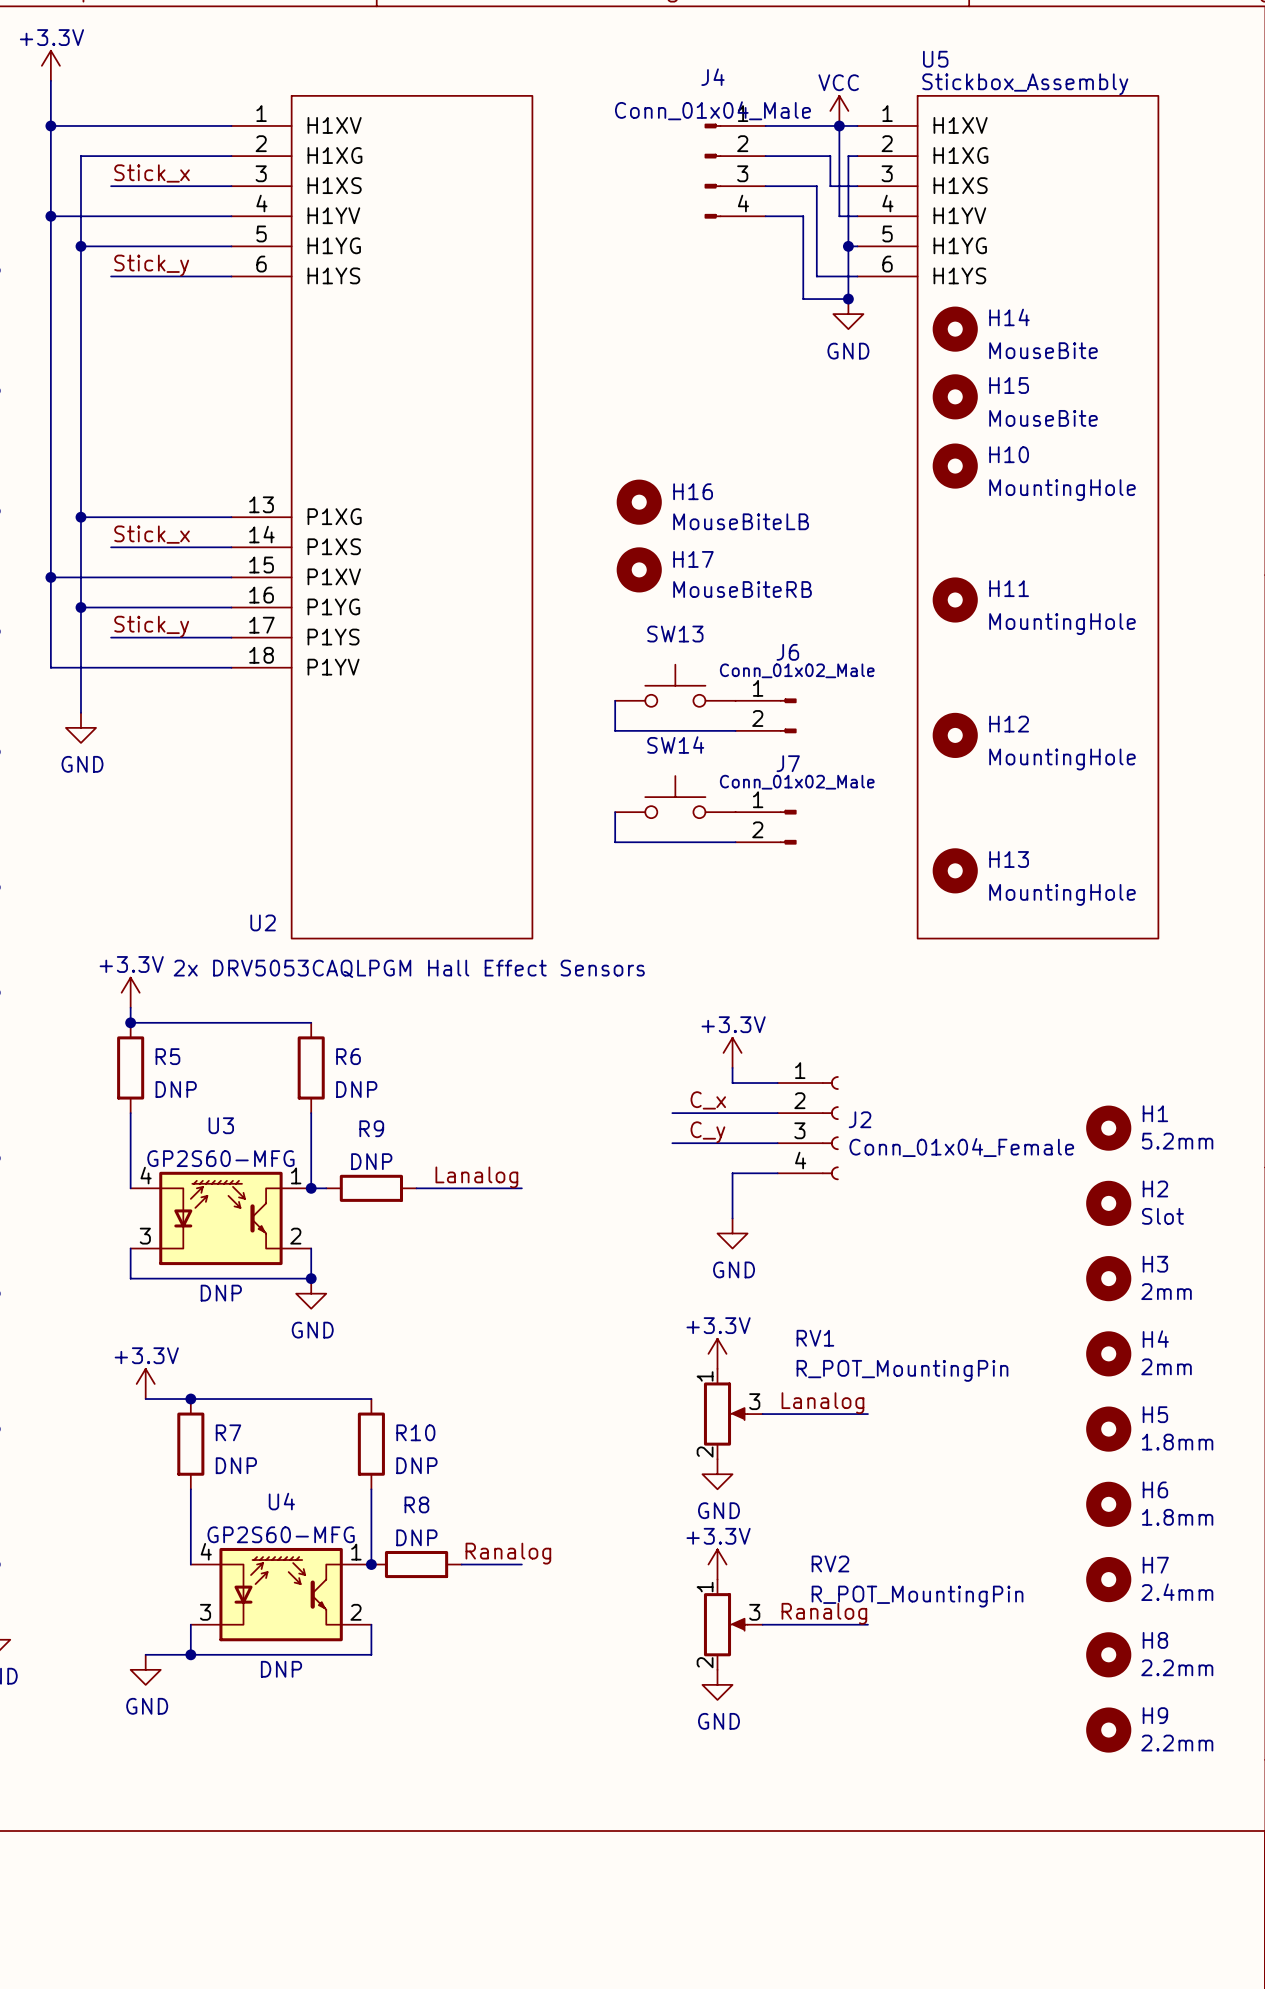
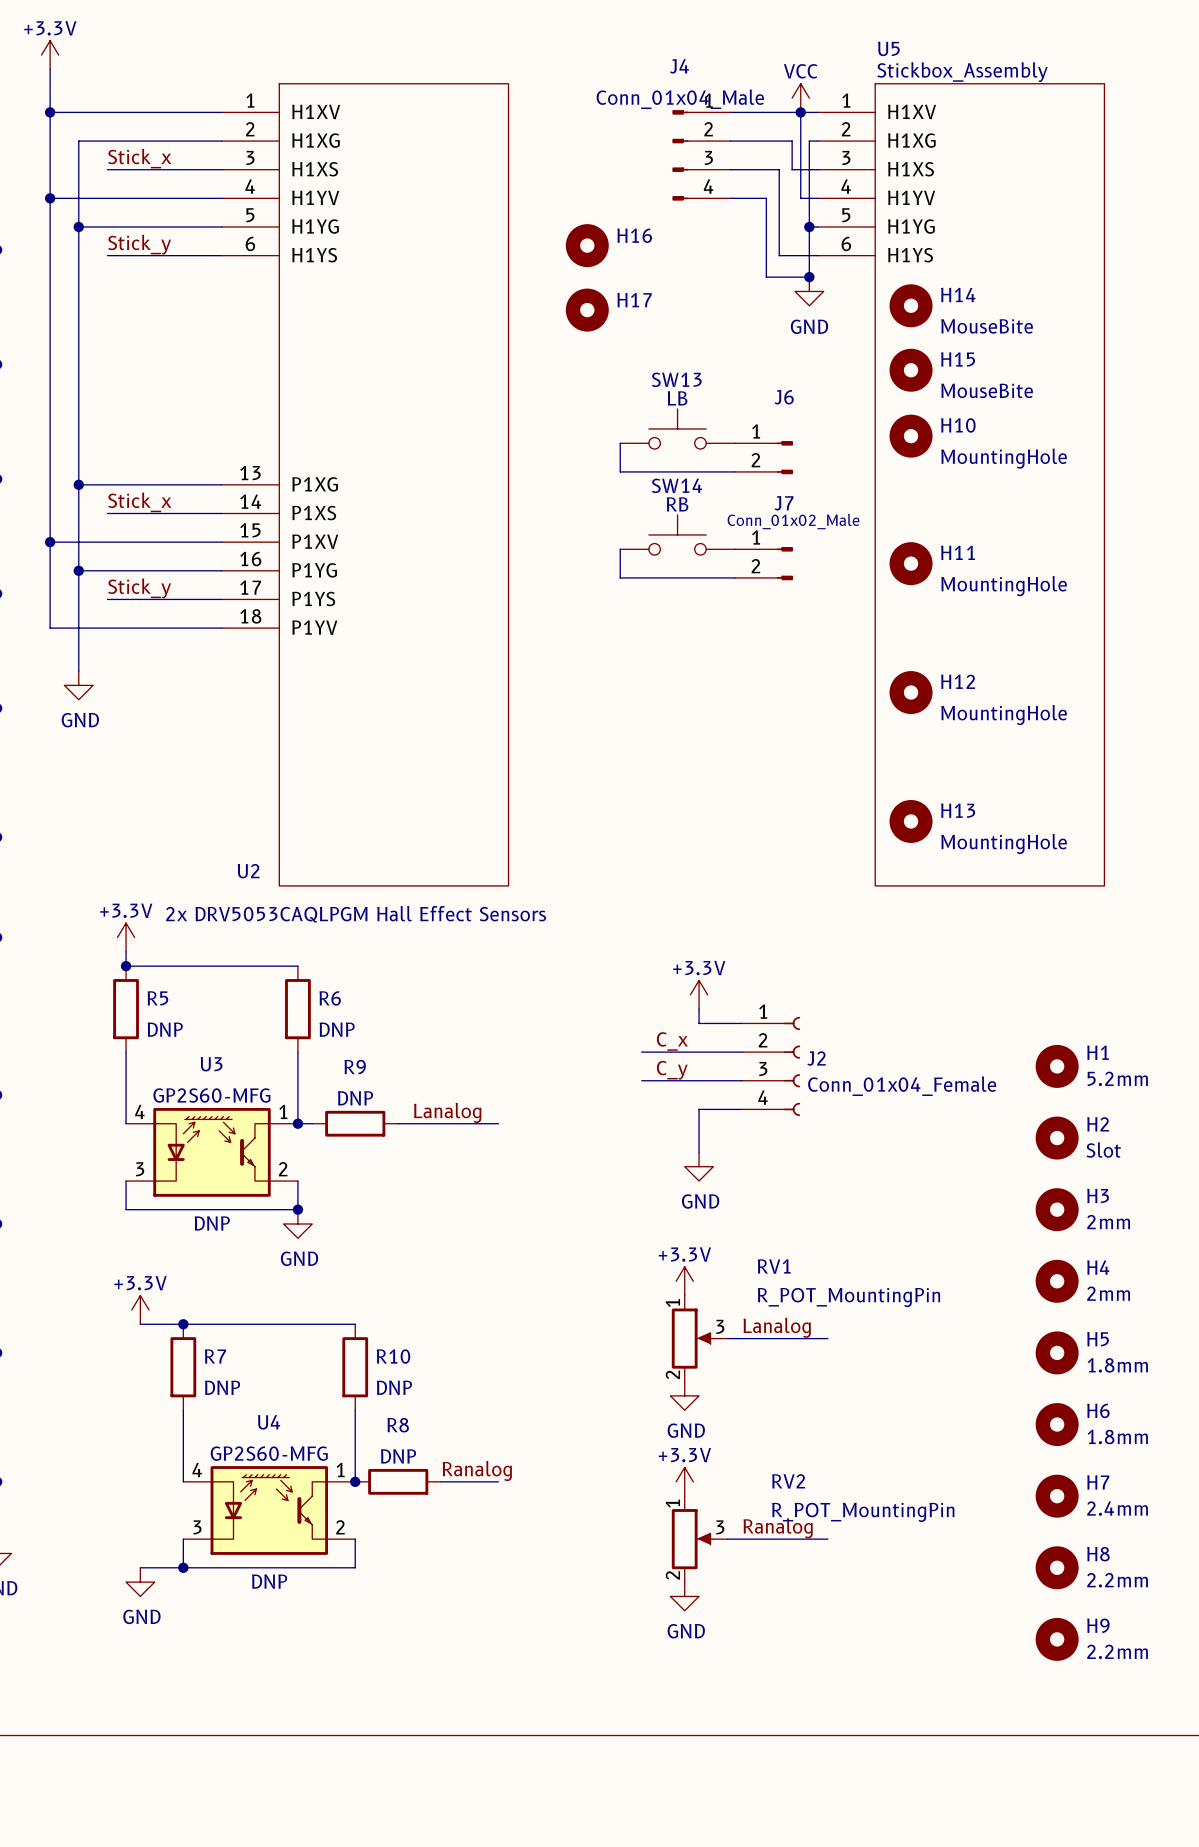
SW13 value: none -> LB (677, 398)
H16 position: (639, 502) -> (587, 245)
H16 value: MouseBiteLB (741, 521) -> none
SW14 value: none -> RB (677, 504)
H17 position: (639, 569) -> (587, 310)
H17 value: MouseBiteRB (742, 589) -> none
J6 value: Conn_01x02_Male (797, 670) -> none
SW13 position: (675, 685) -> (677, 428)
wire: (615, 700) (615, 730) (735, 730) -> (620, 443) (620, 471) (734, 471)
J6 position: (766, 715) -> (763, 457)
SW14 position: (675, 797) -> (677, 534)
wire: (615, 812) (615, 842) (735, 842) -> (620, 549) (620, 577) (734, 577)
J7 position: (766, 827) -> (763, 563)

